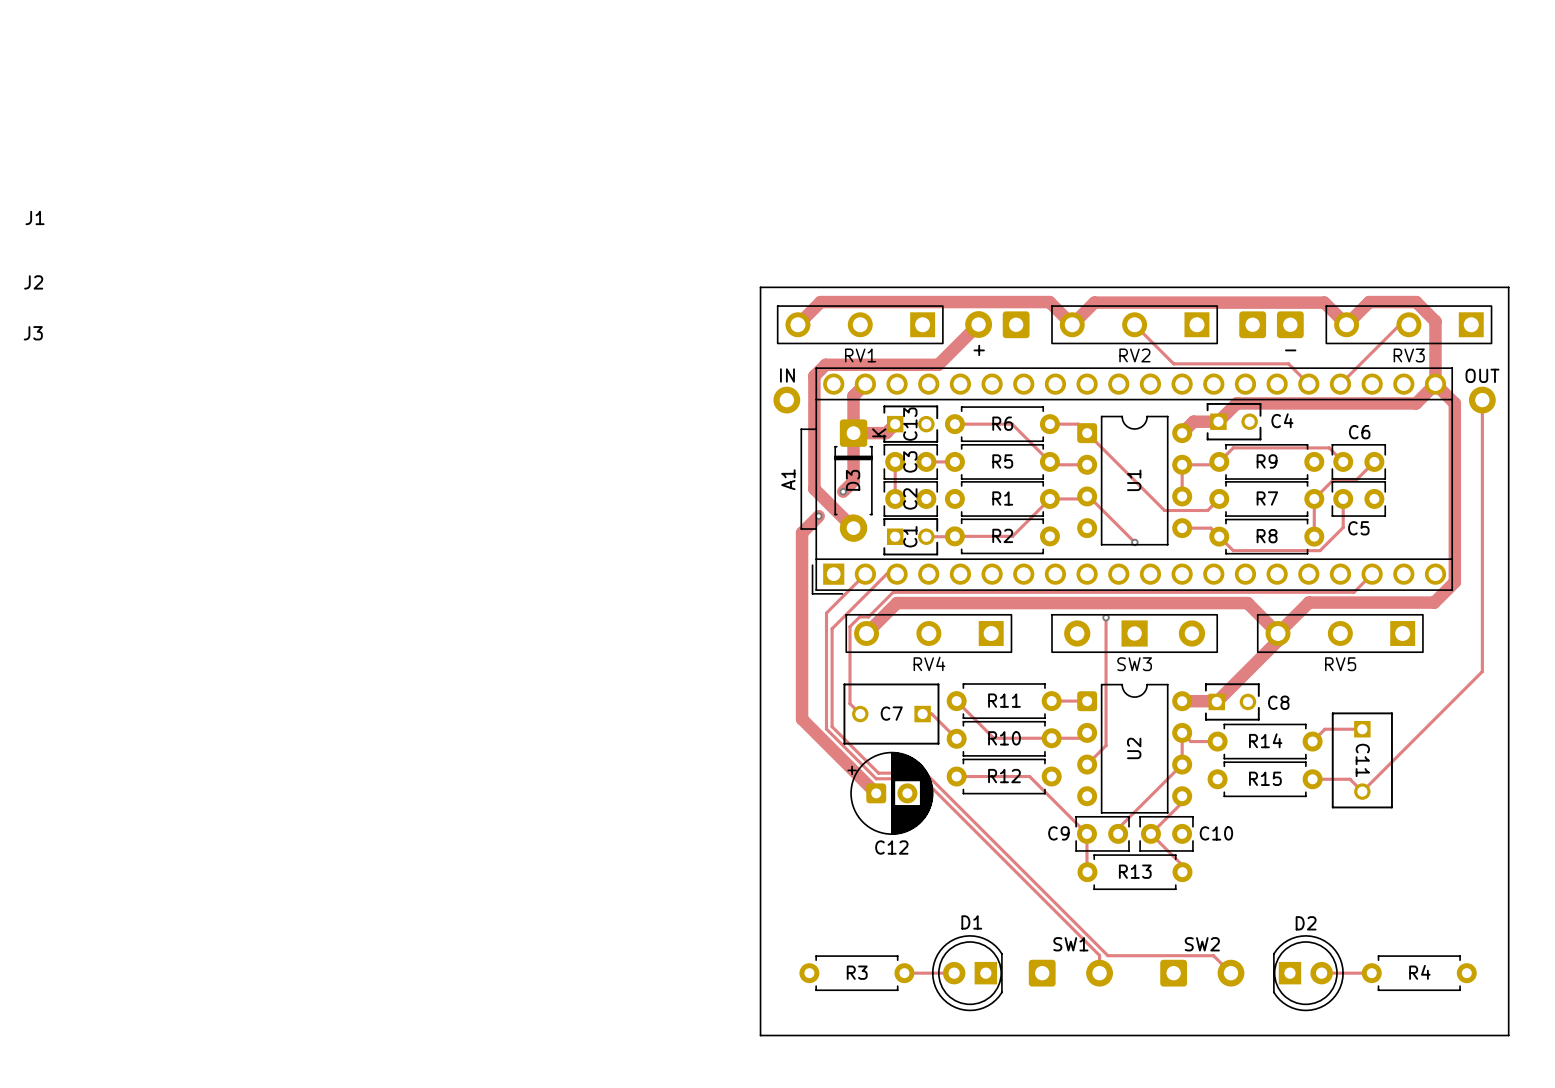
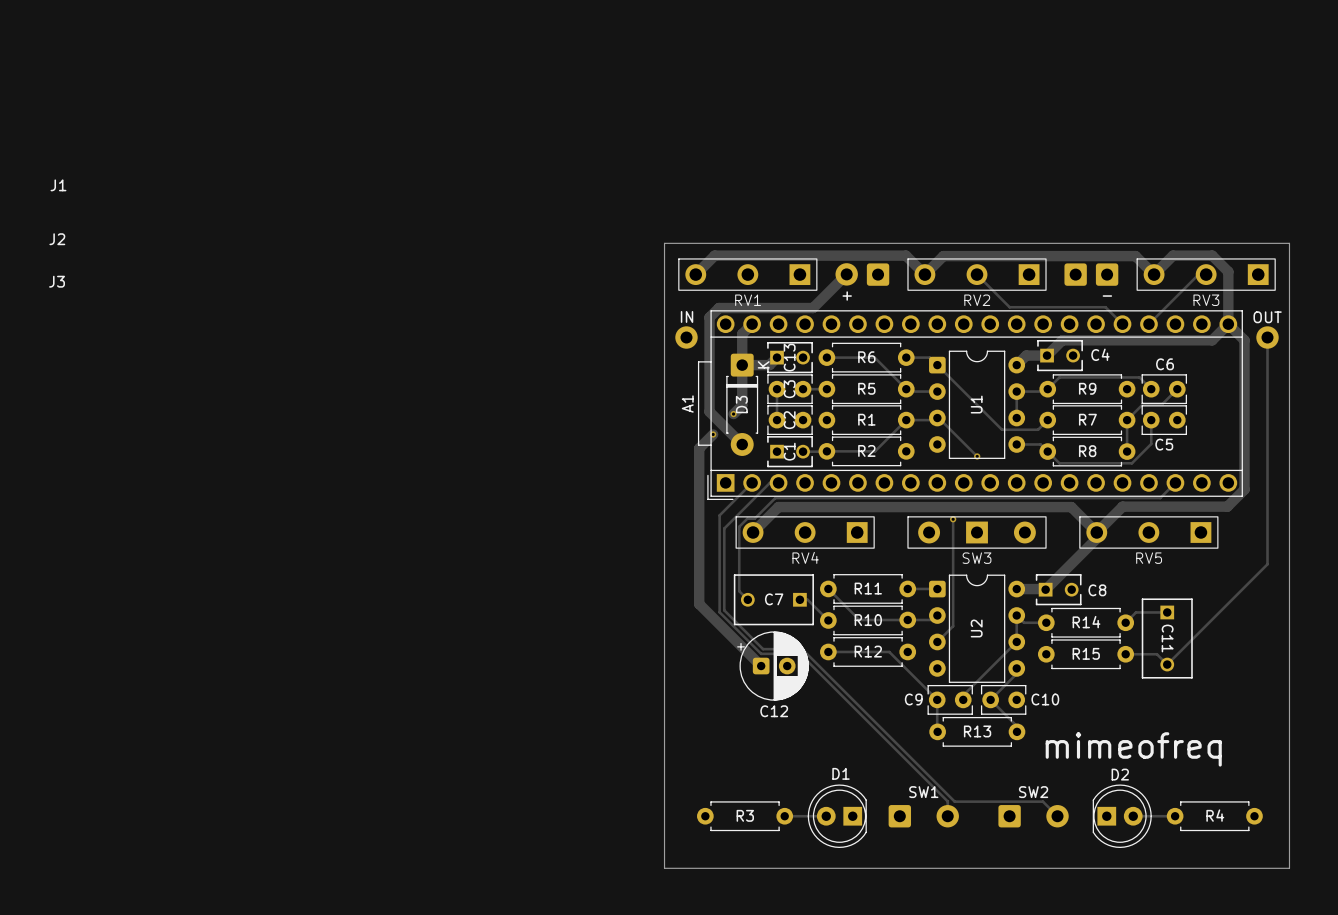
text: none -> mimeofreq (1133, 749)

